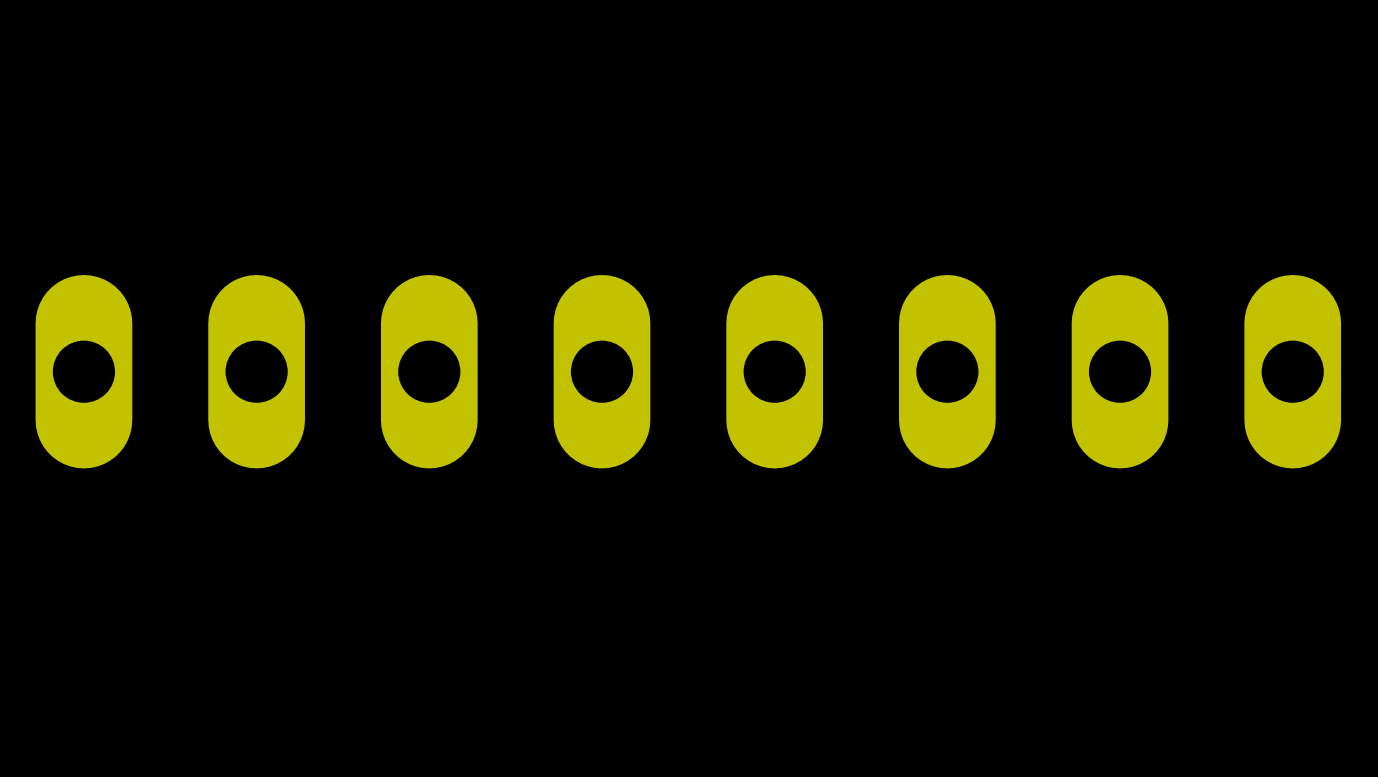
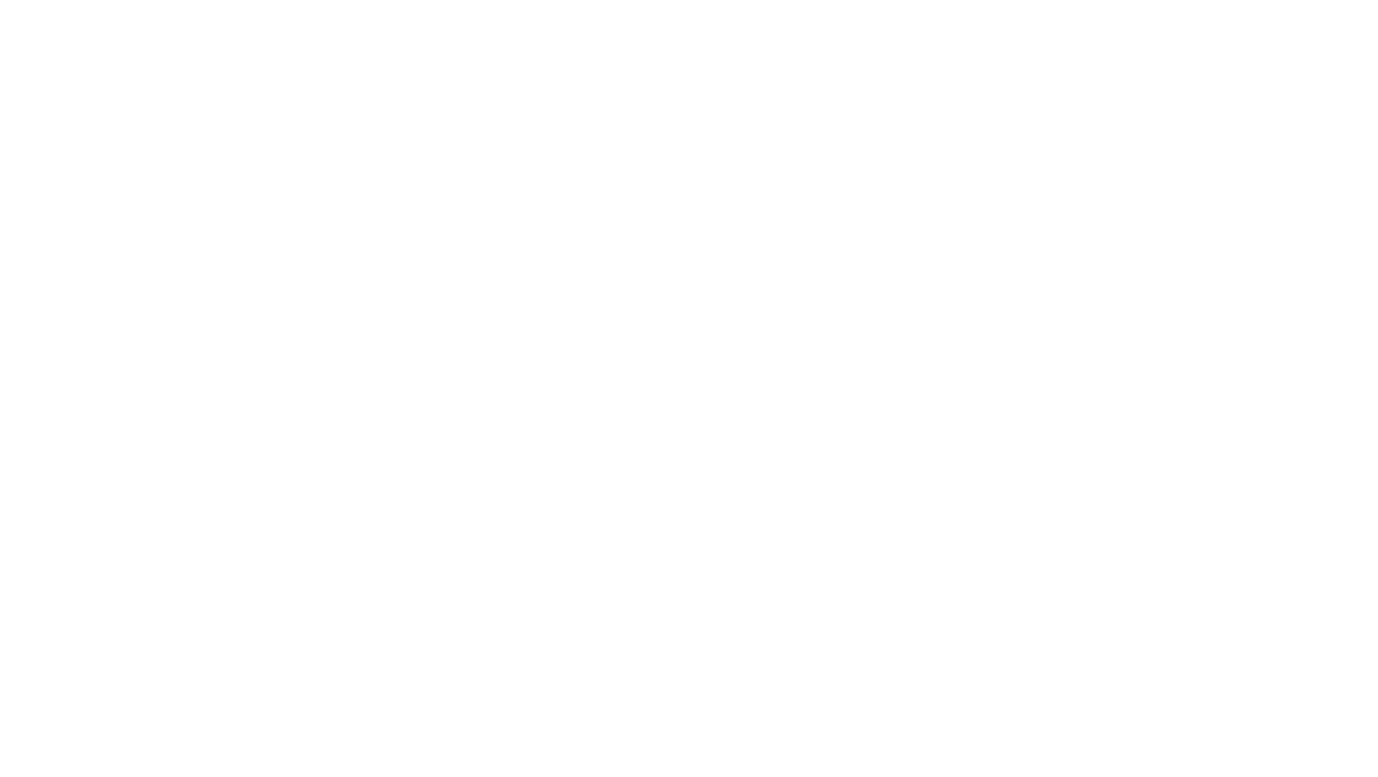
part: (688, 371) -> none

